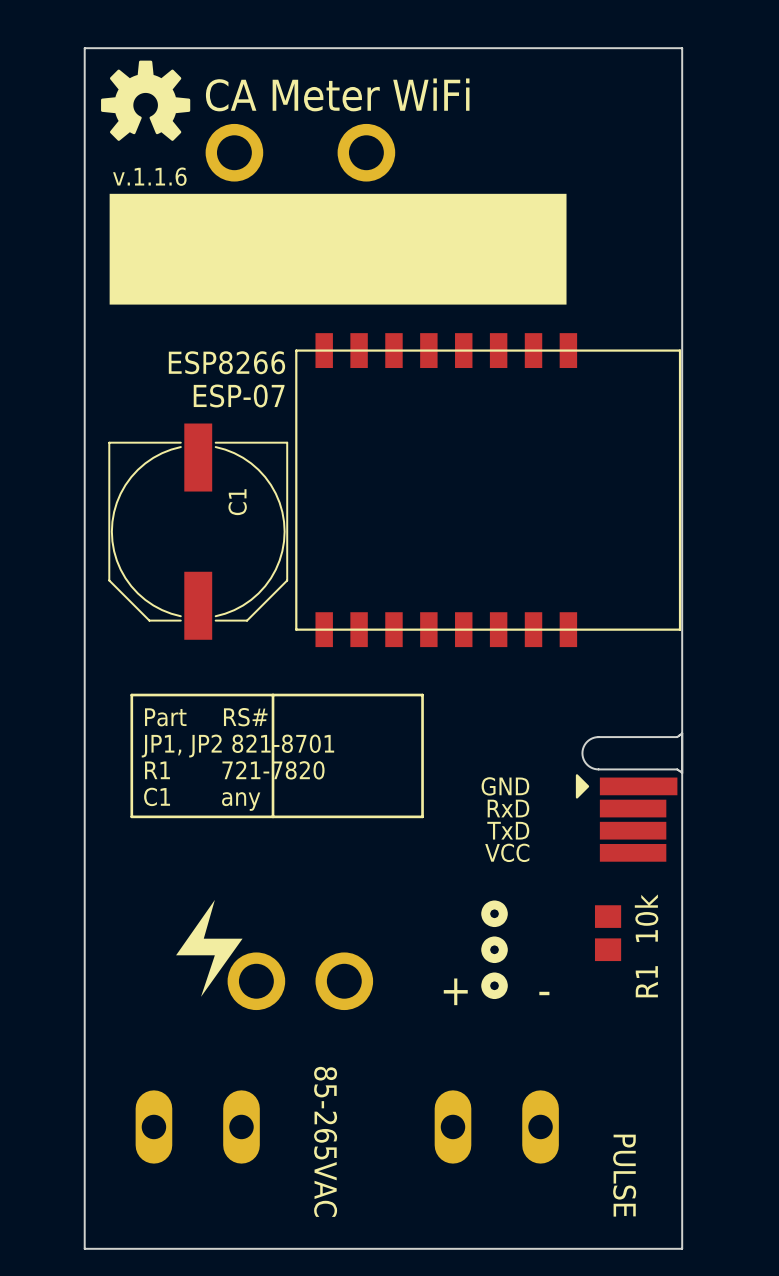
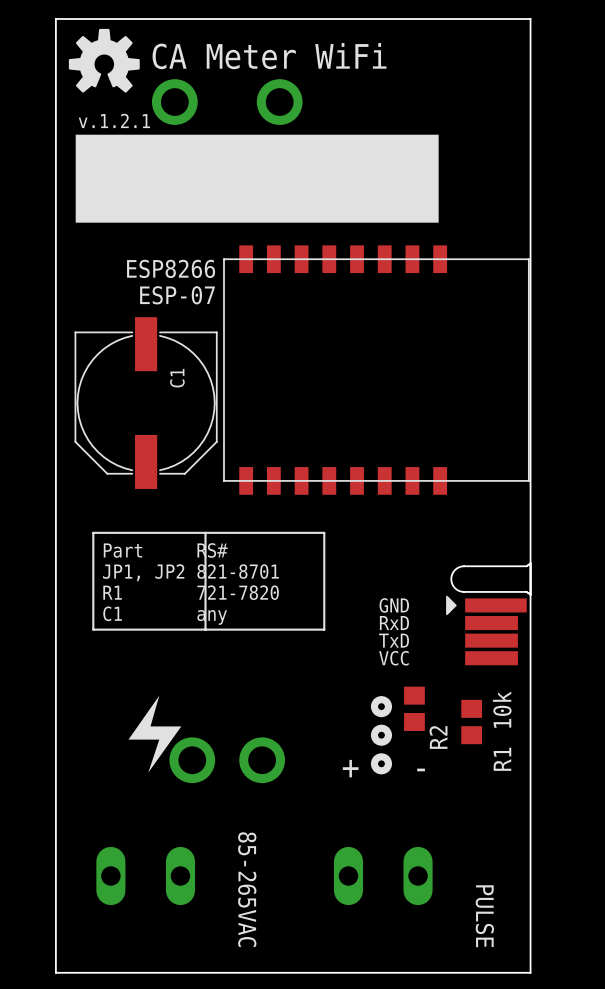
text: v.1.1.6 (149, 176) -> v.1.2.1 (114, 120)
R2: none -> (414, 708)

